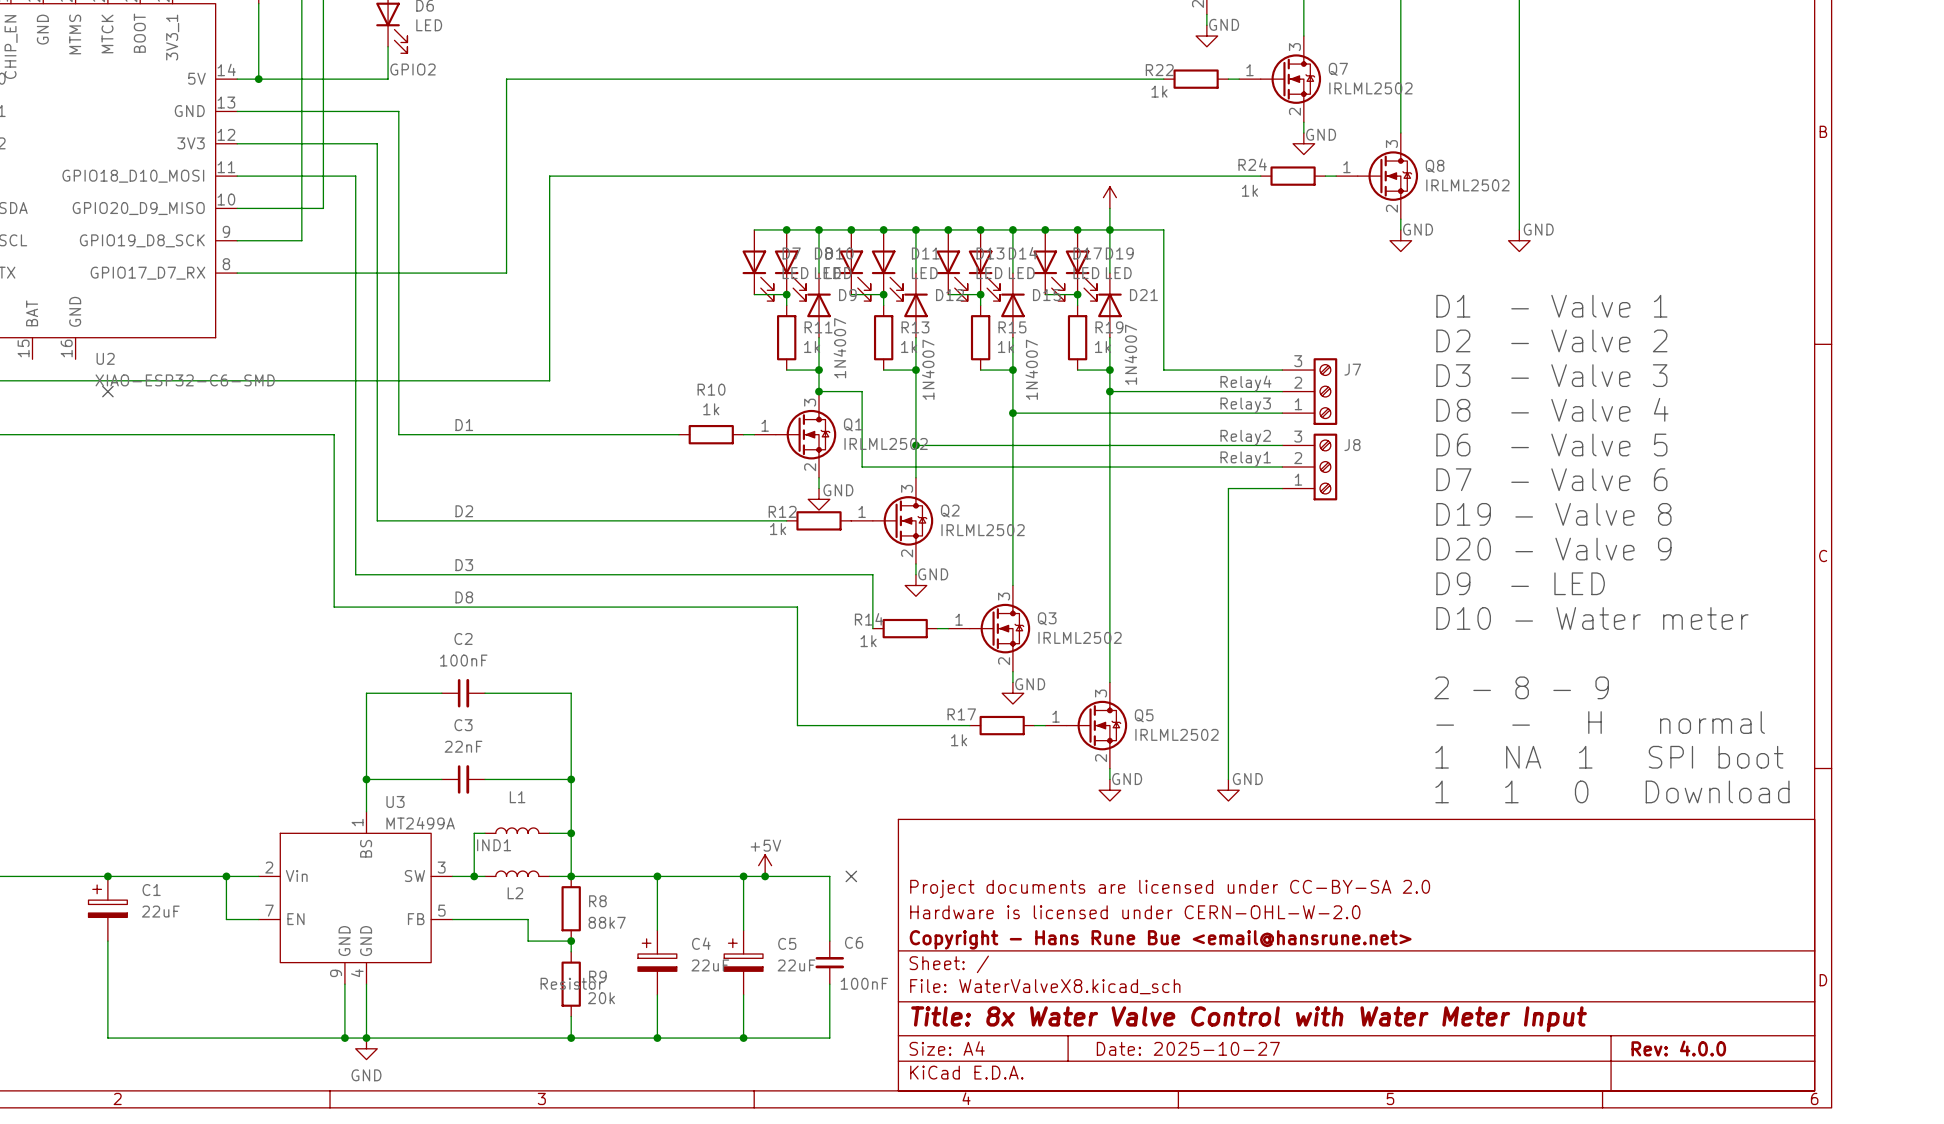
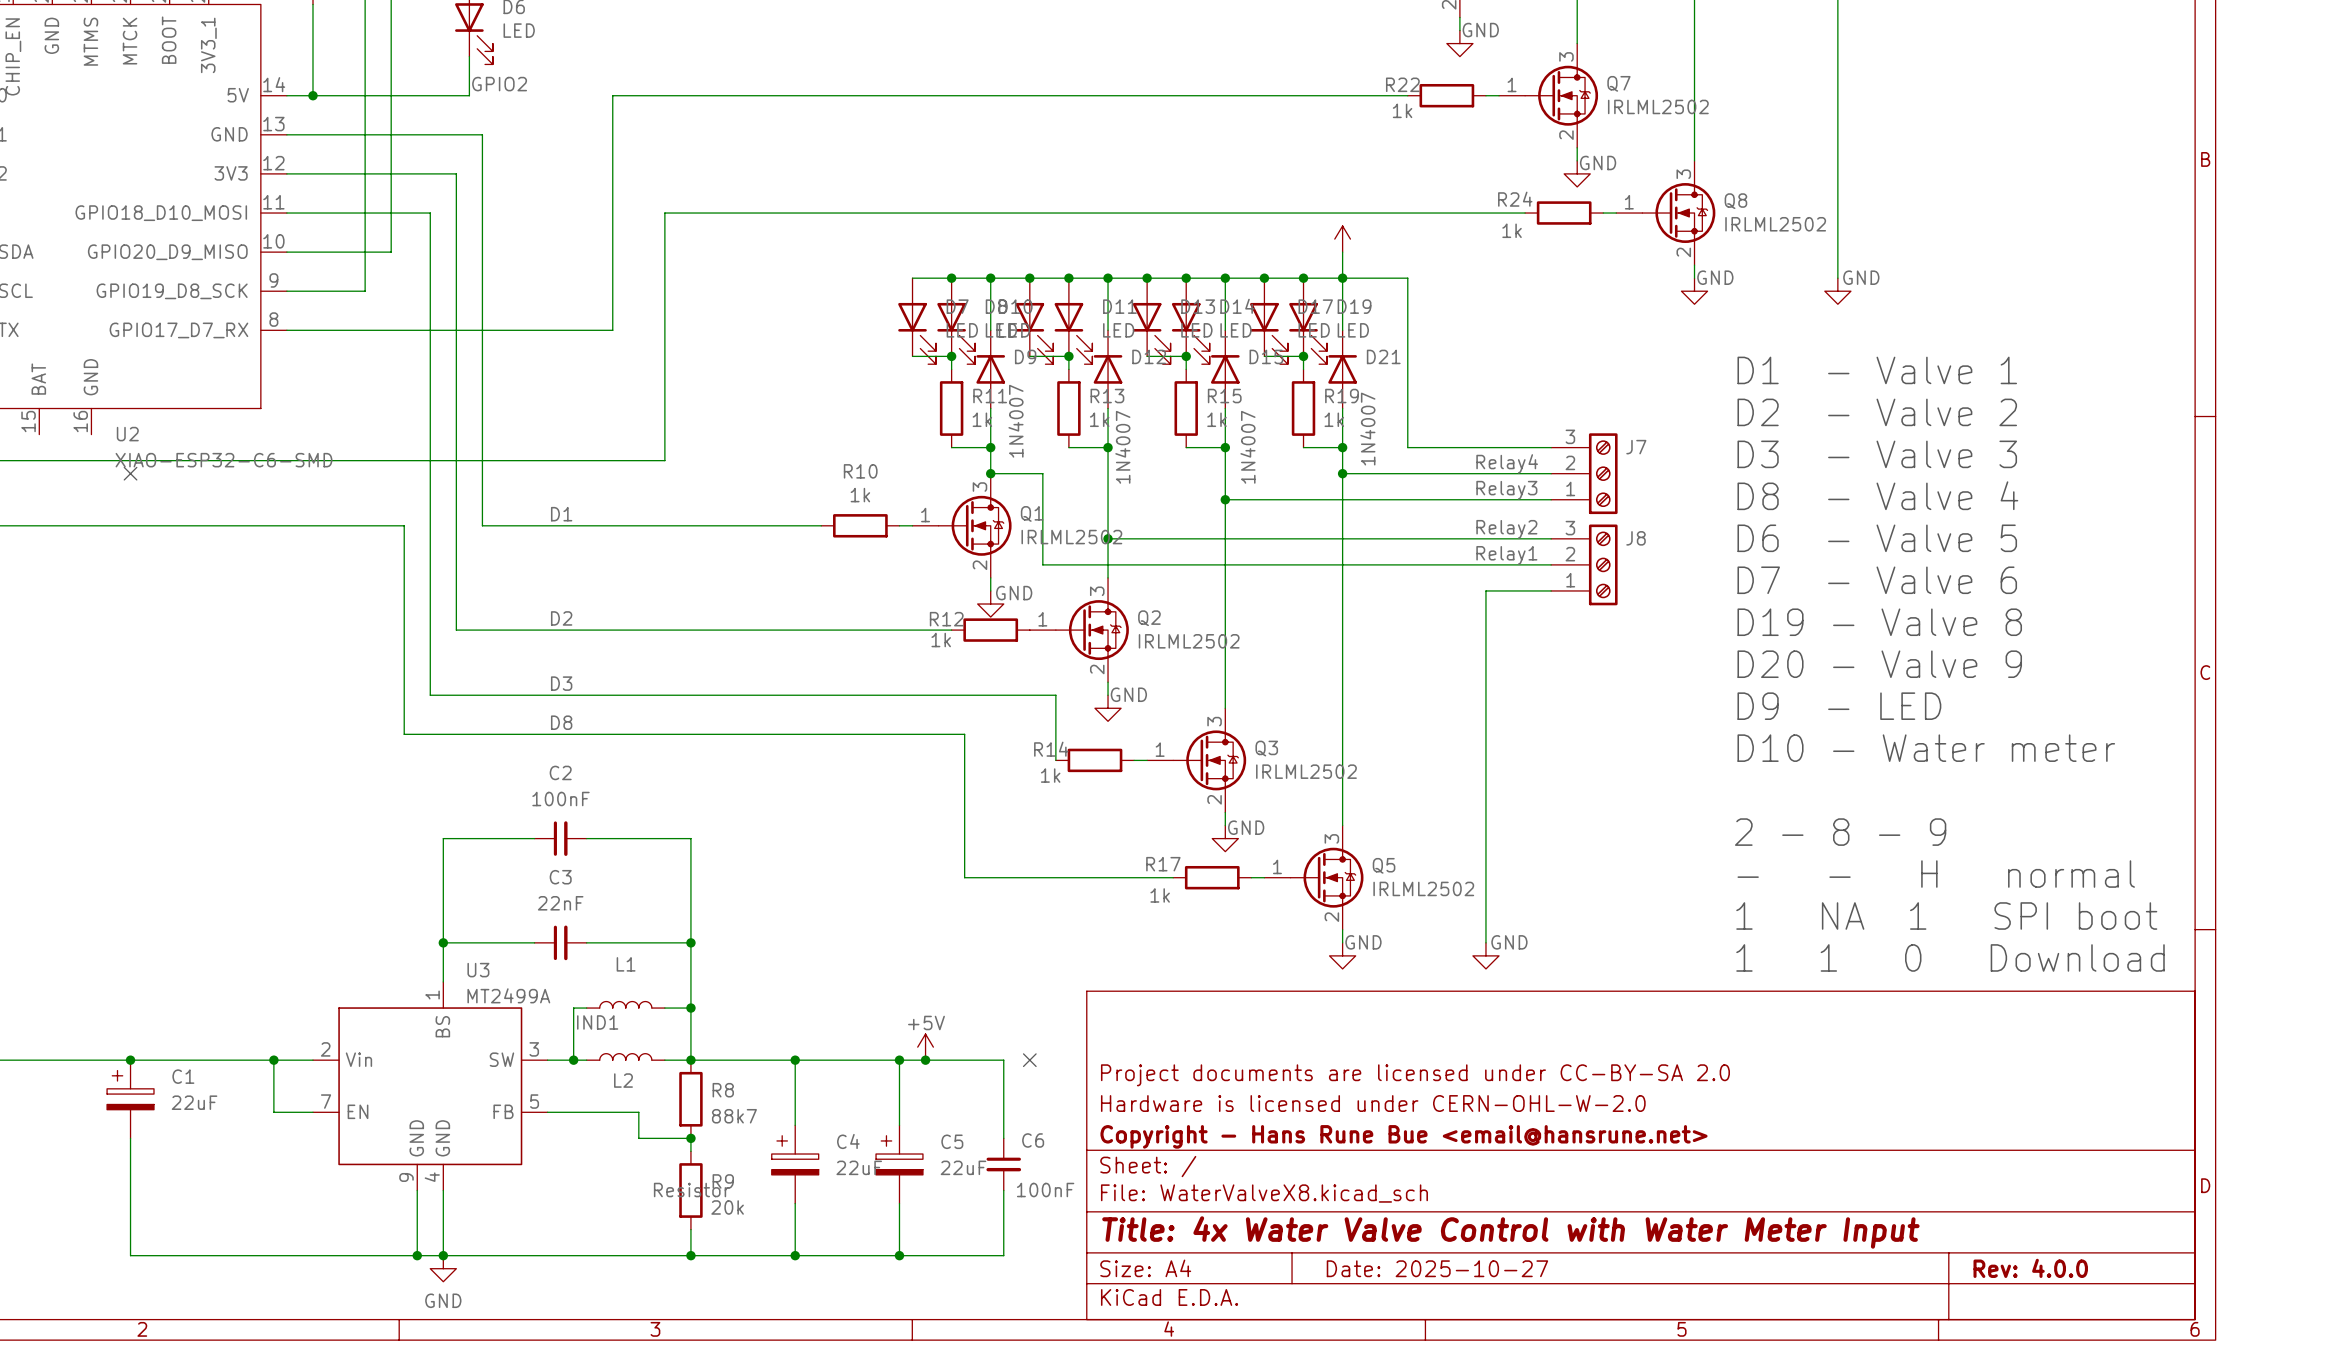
title block: Title: 8x Water Valve Control with Water Meter Input (1249, 1019) -> Title: 4x Water Valve Control with Water Meter Input (1510, 1232)

